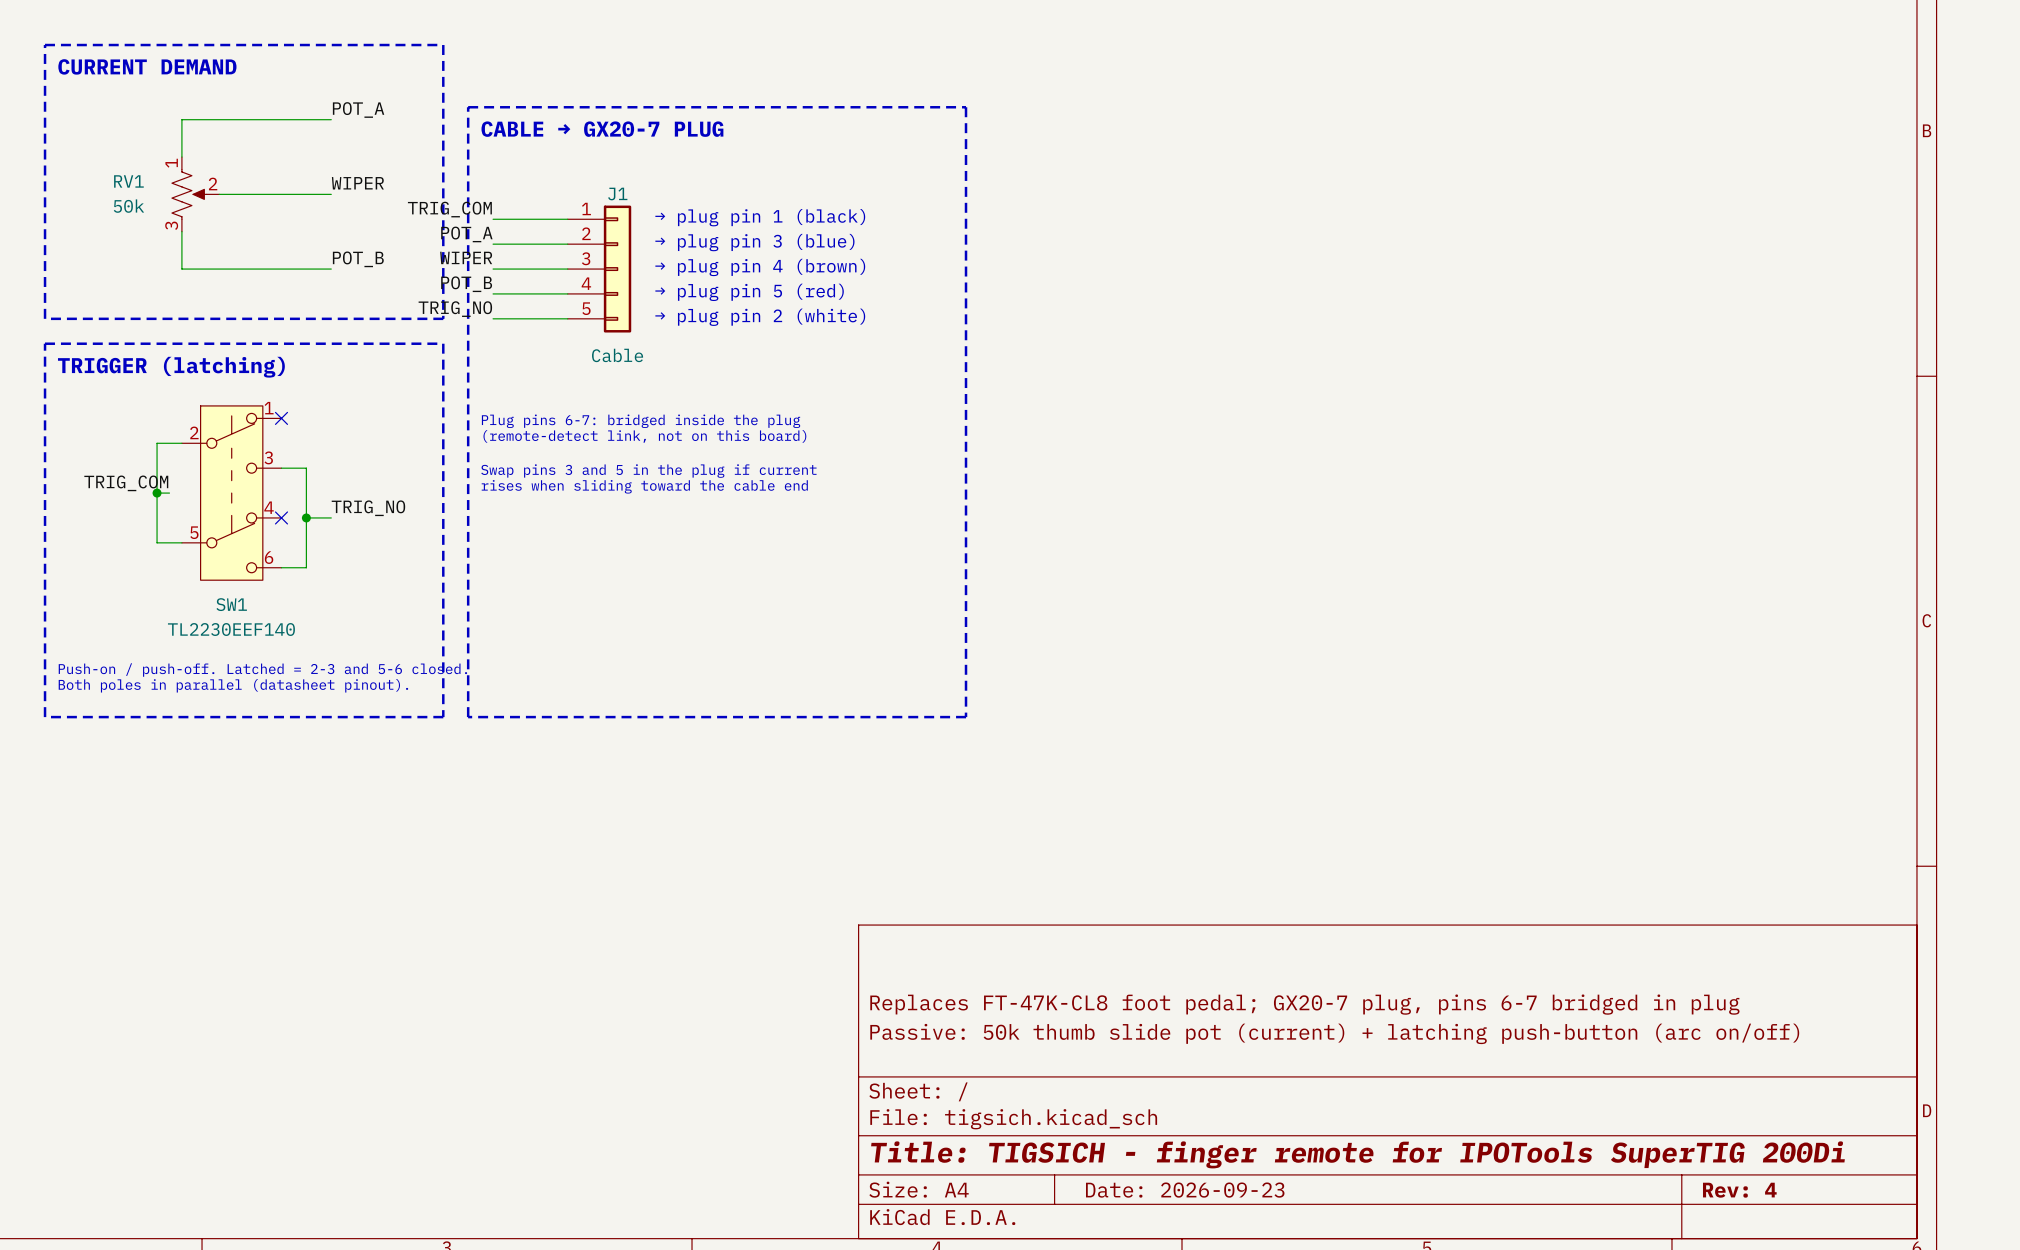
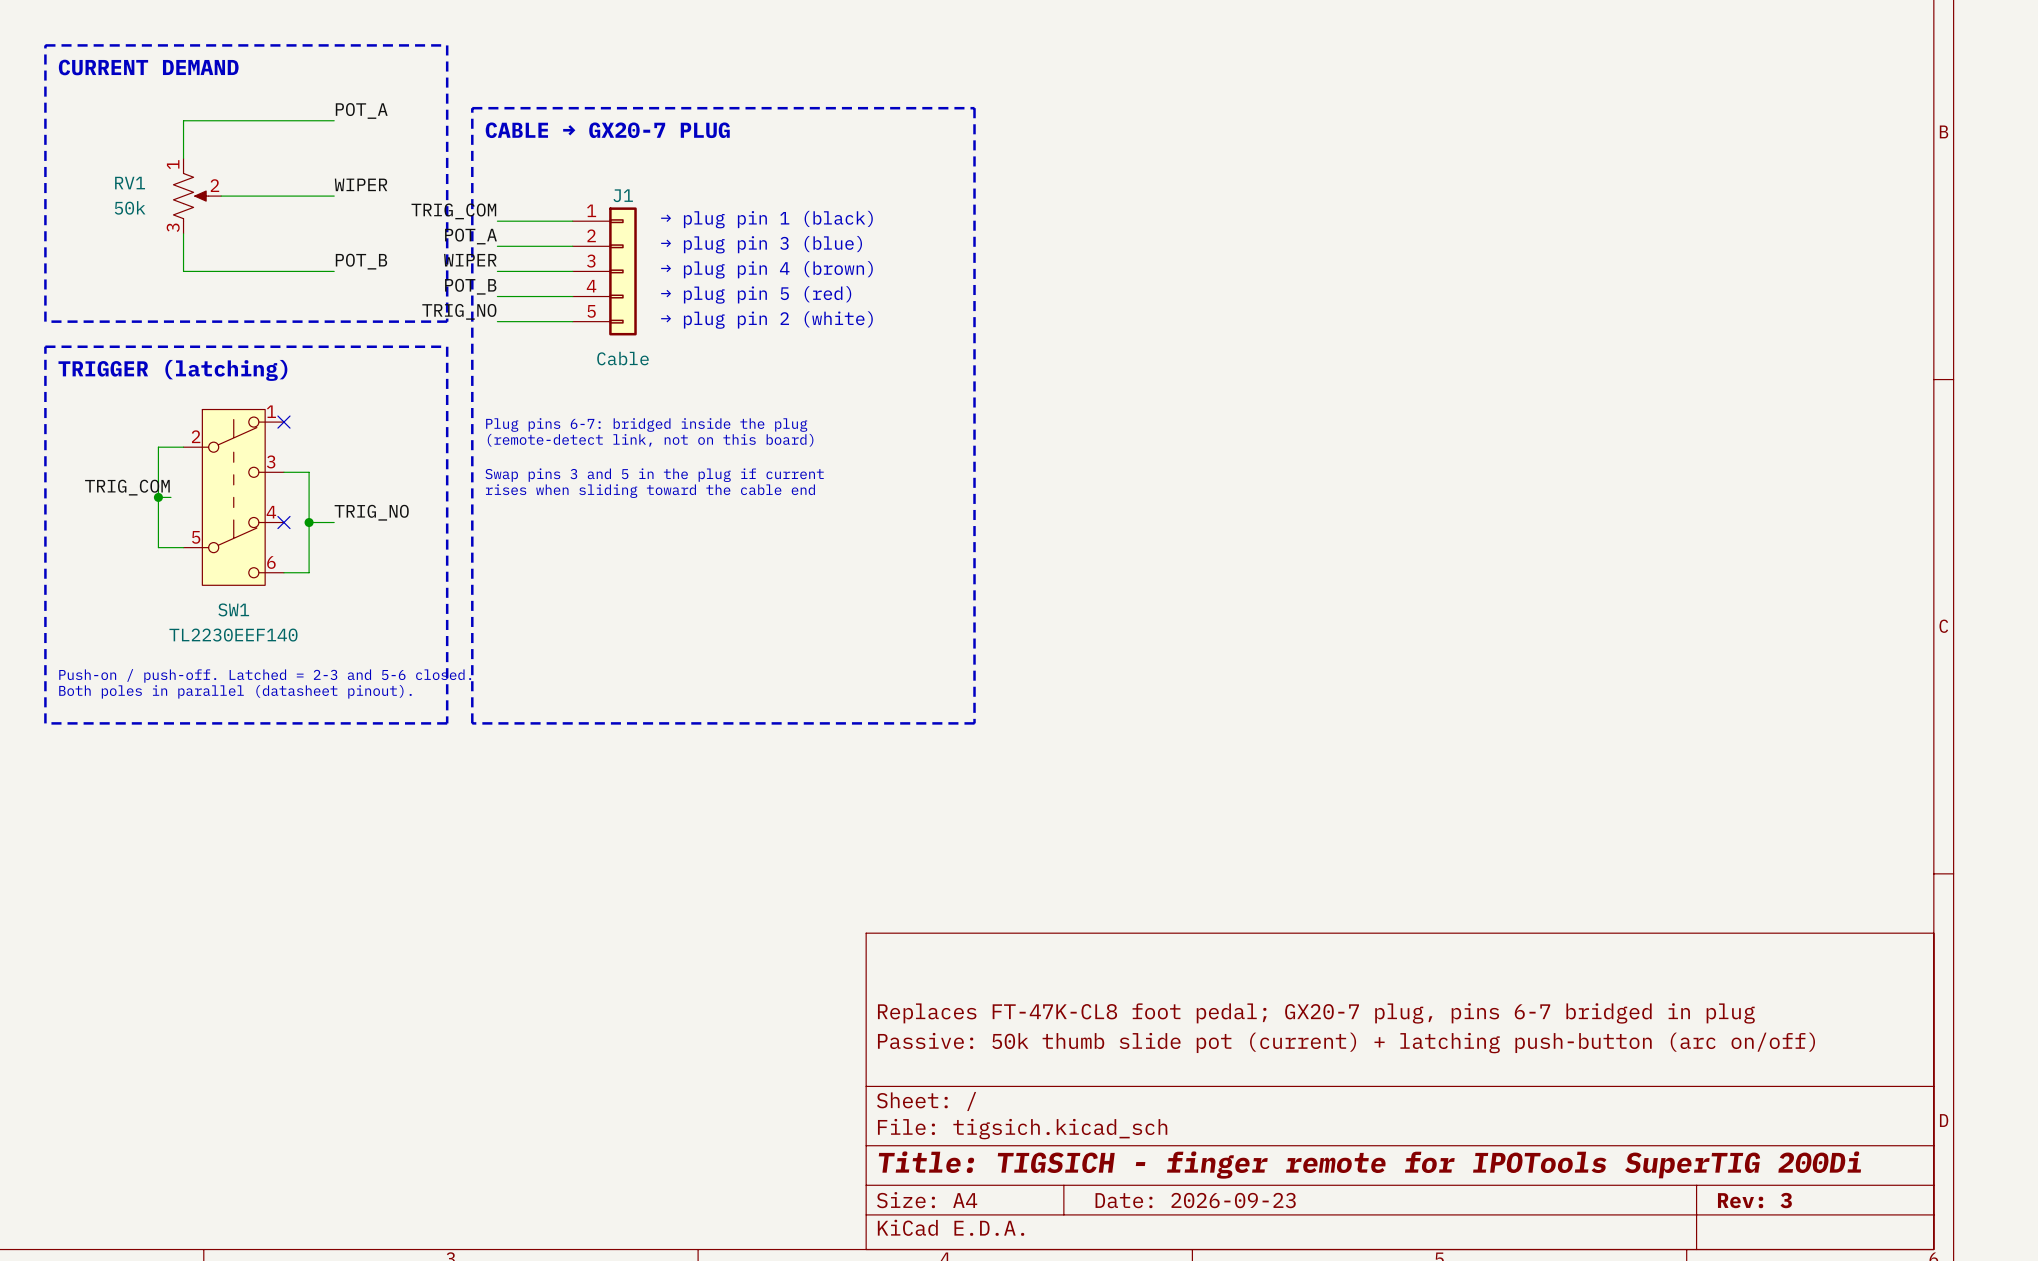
title block: Rev: 4 (1739, 1190) -> Rev: 3 (1754, 1200)

